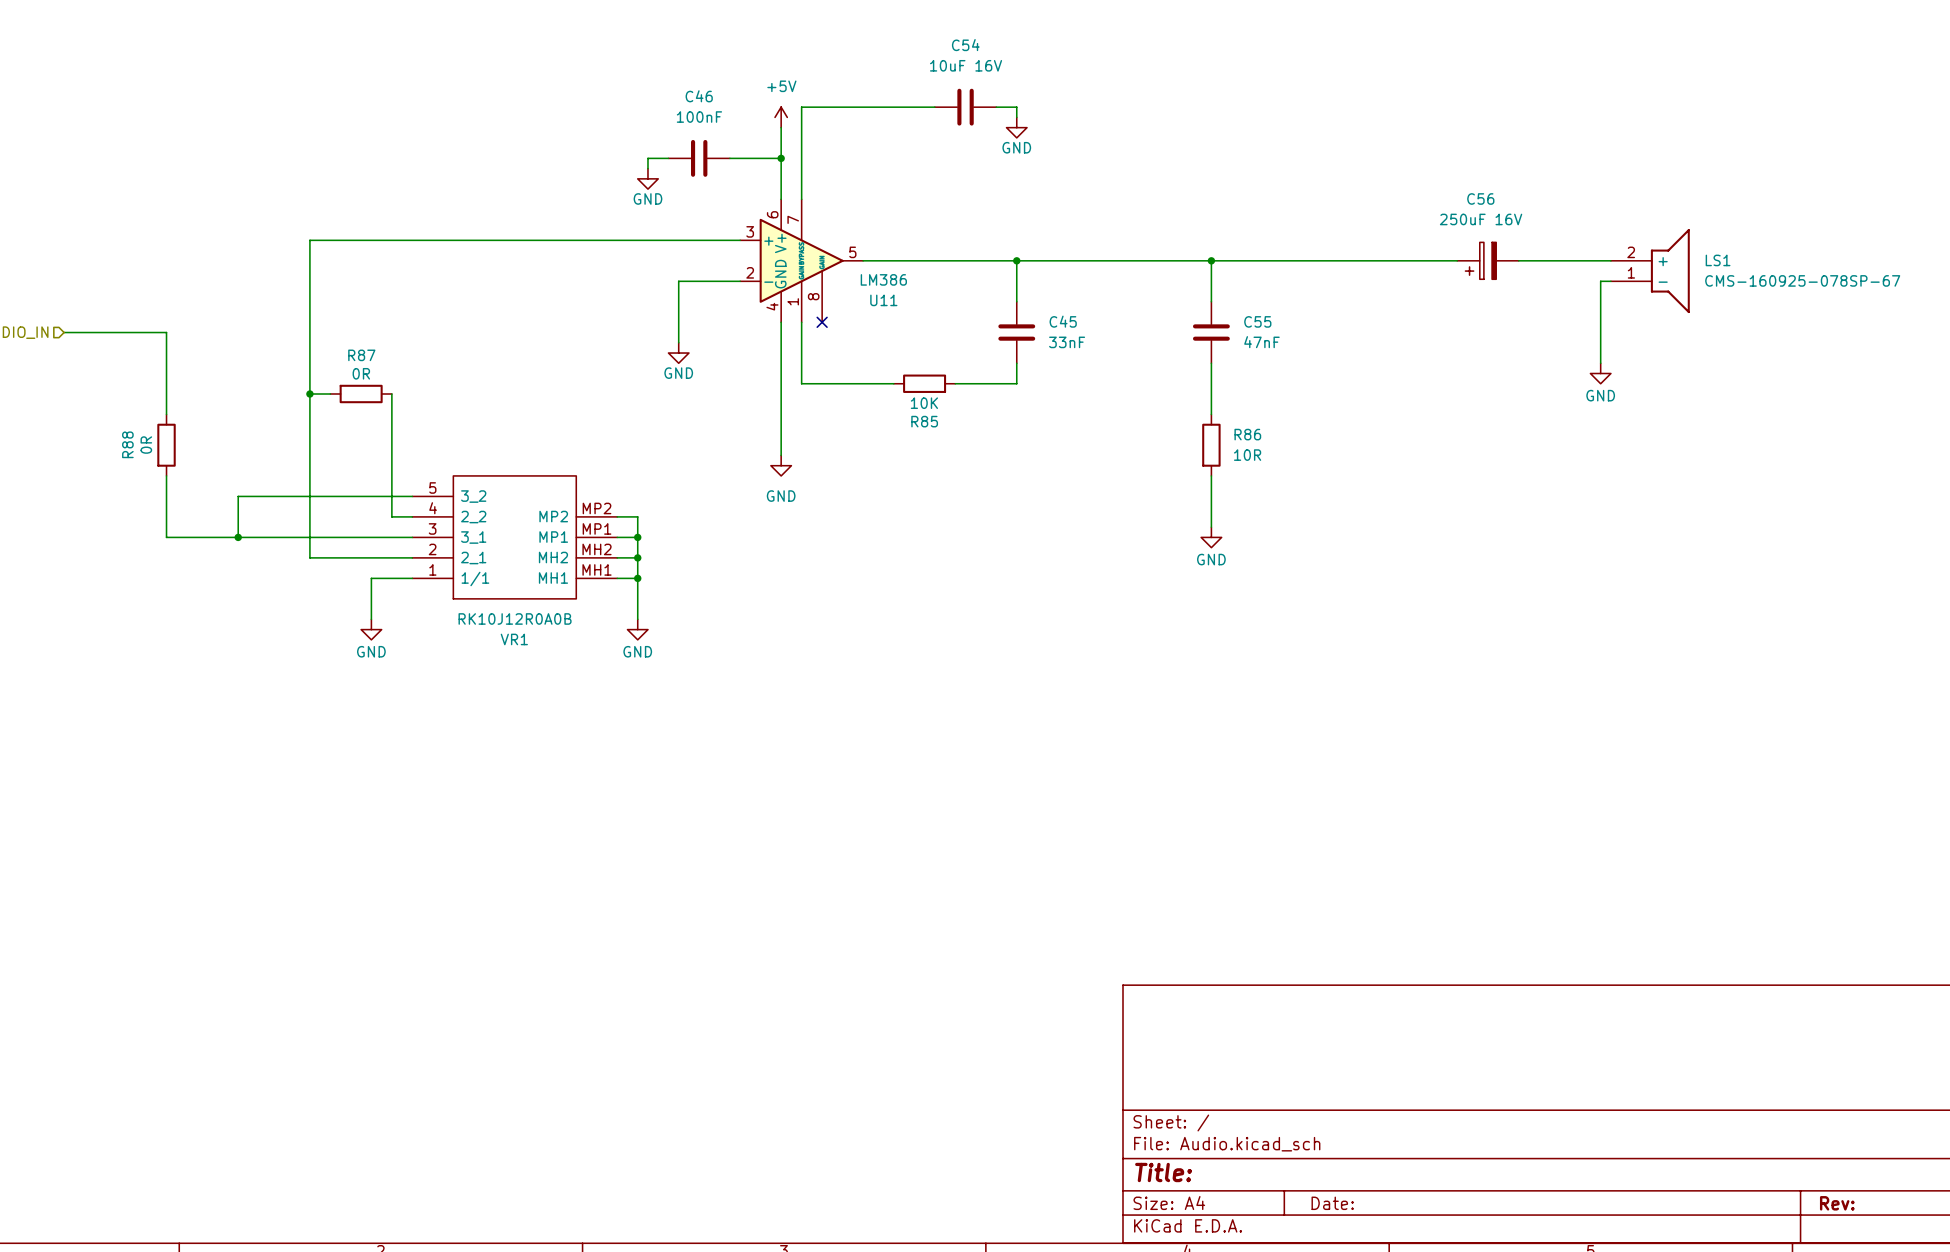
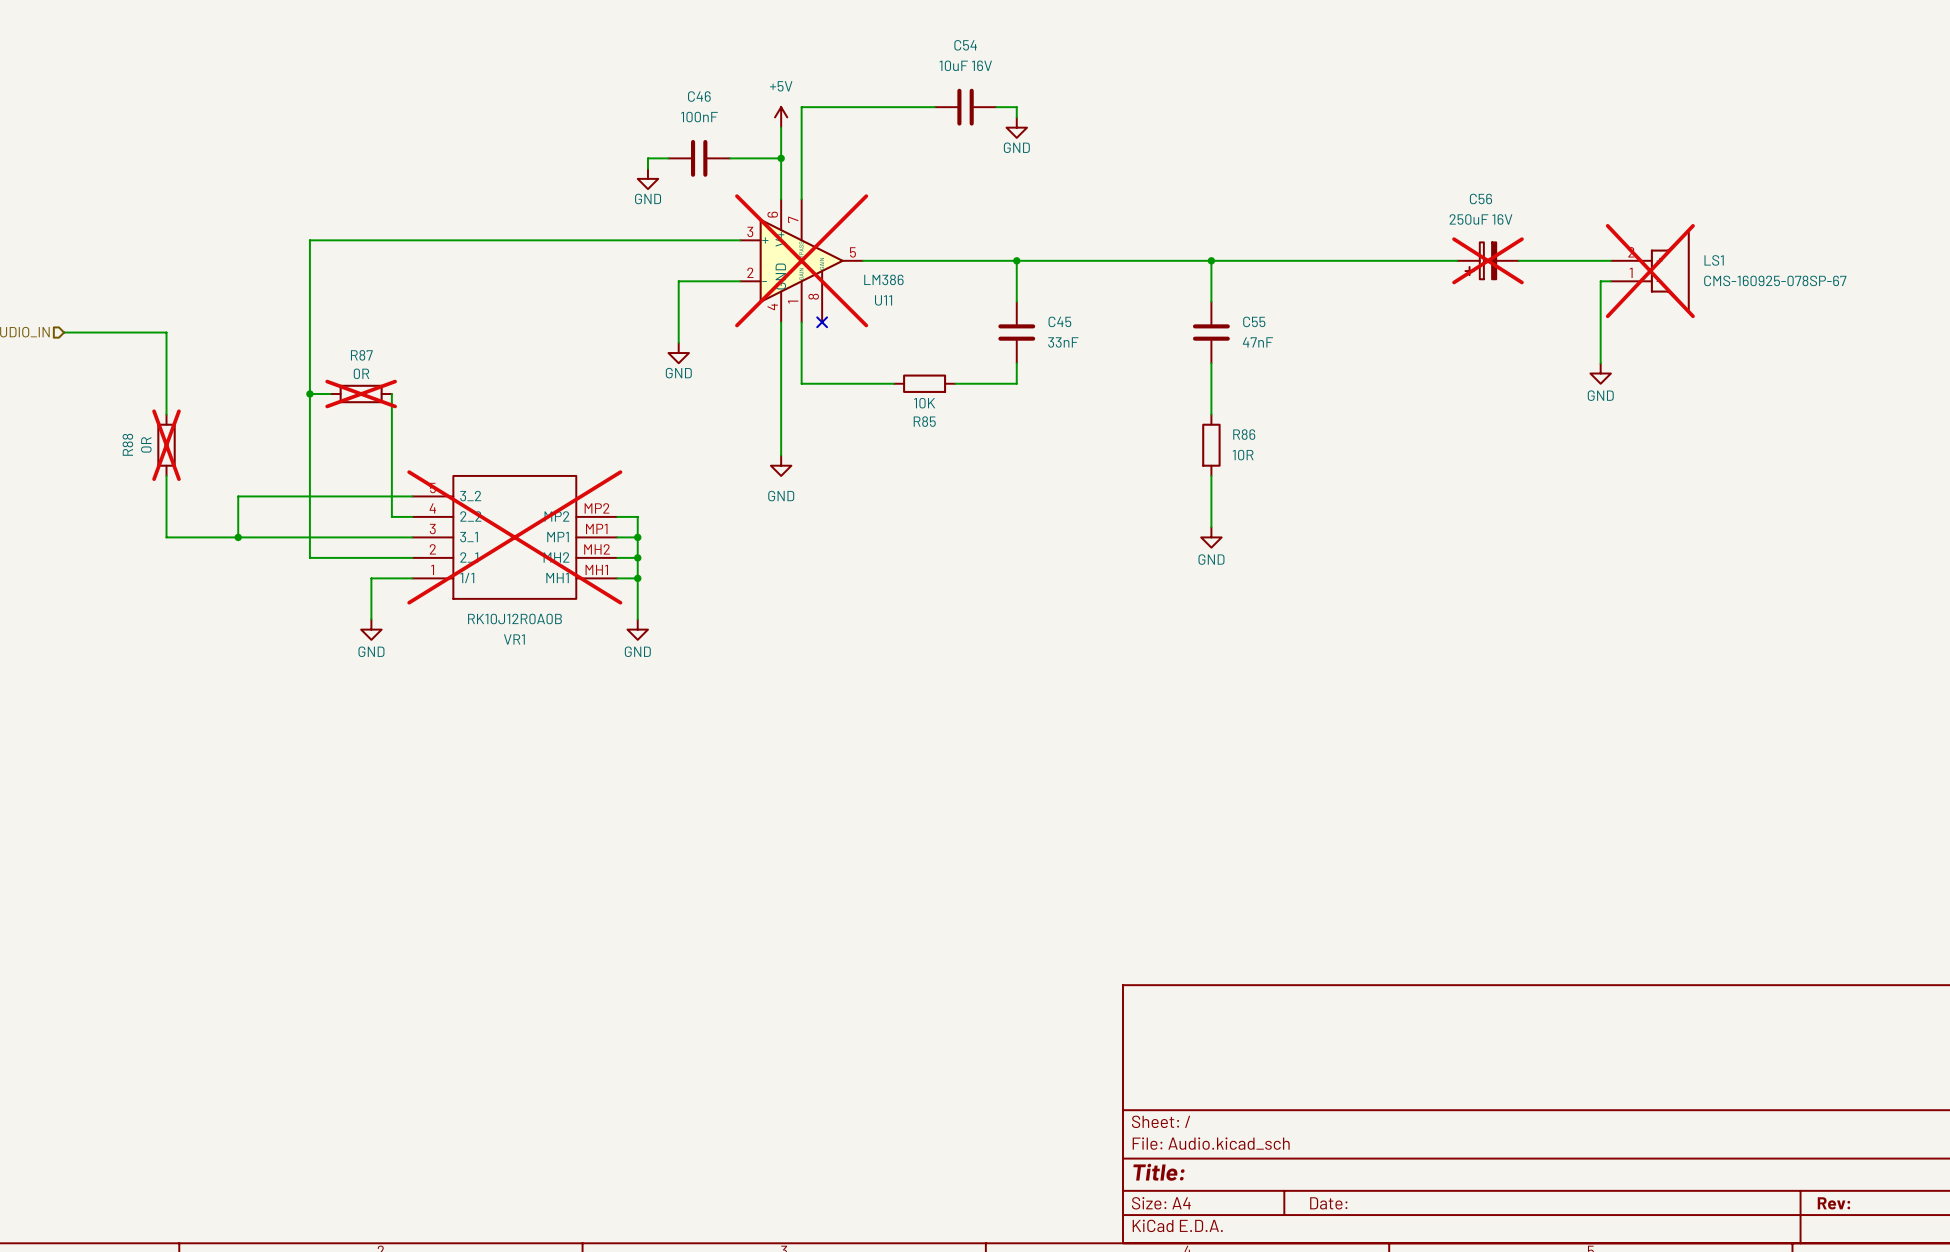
U11 do-not-place cross: none -> (801, 260)
C56 do-not-place cross: none -> (1487, 260)
LS1 do-not-place cross: none -> (1650, 271)
R87 do-not-place cross: none -> (361, 393)
R88 do-not-place cross: none -> (166, 445)
VR1 do-not-place cross: none -> (514, 537)

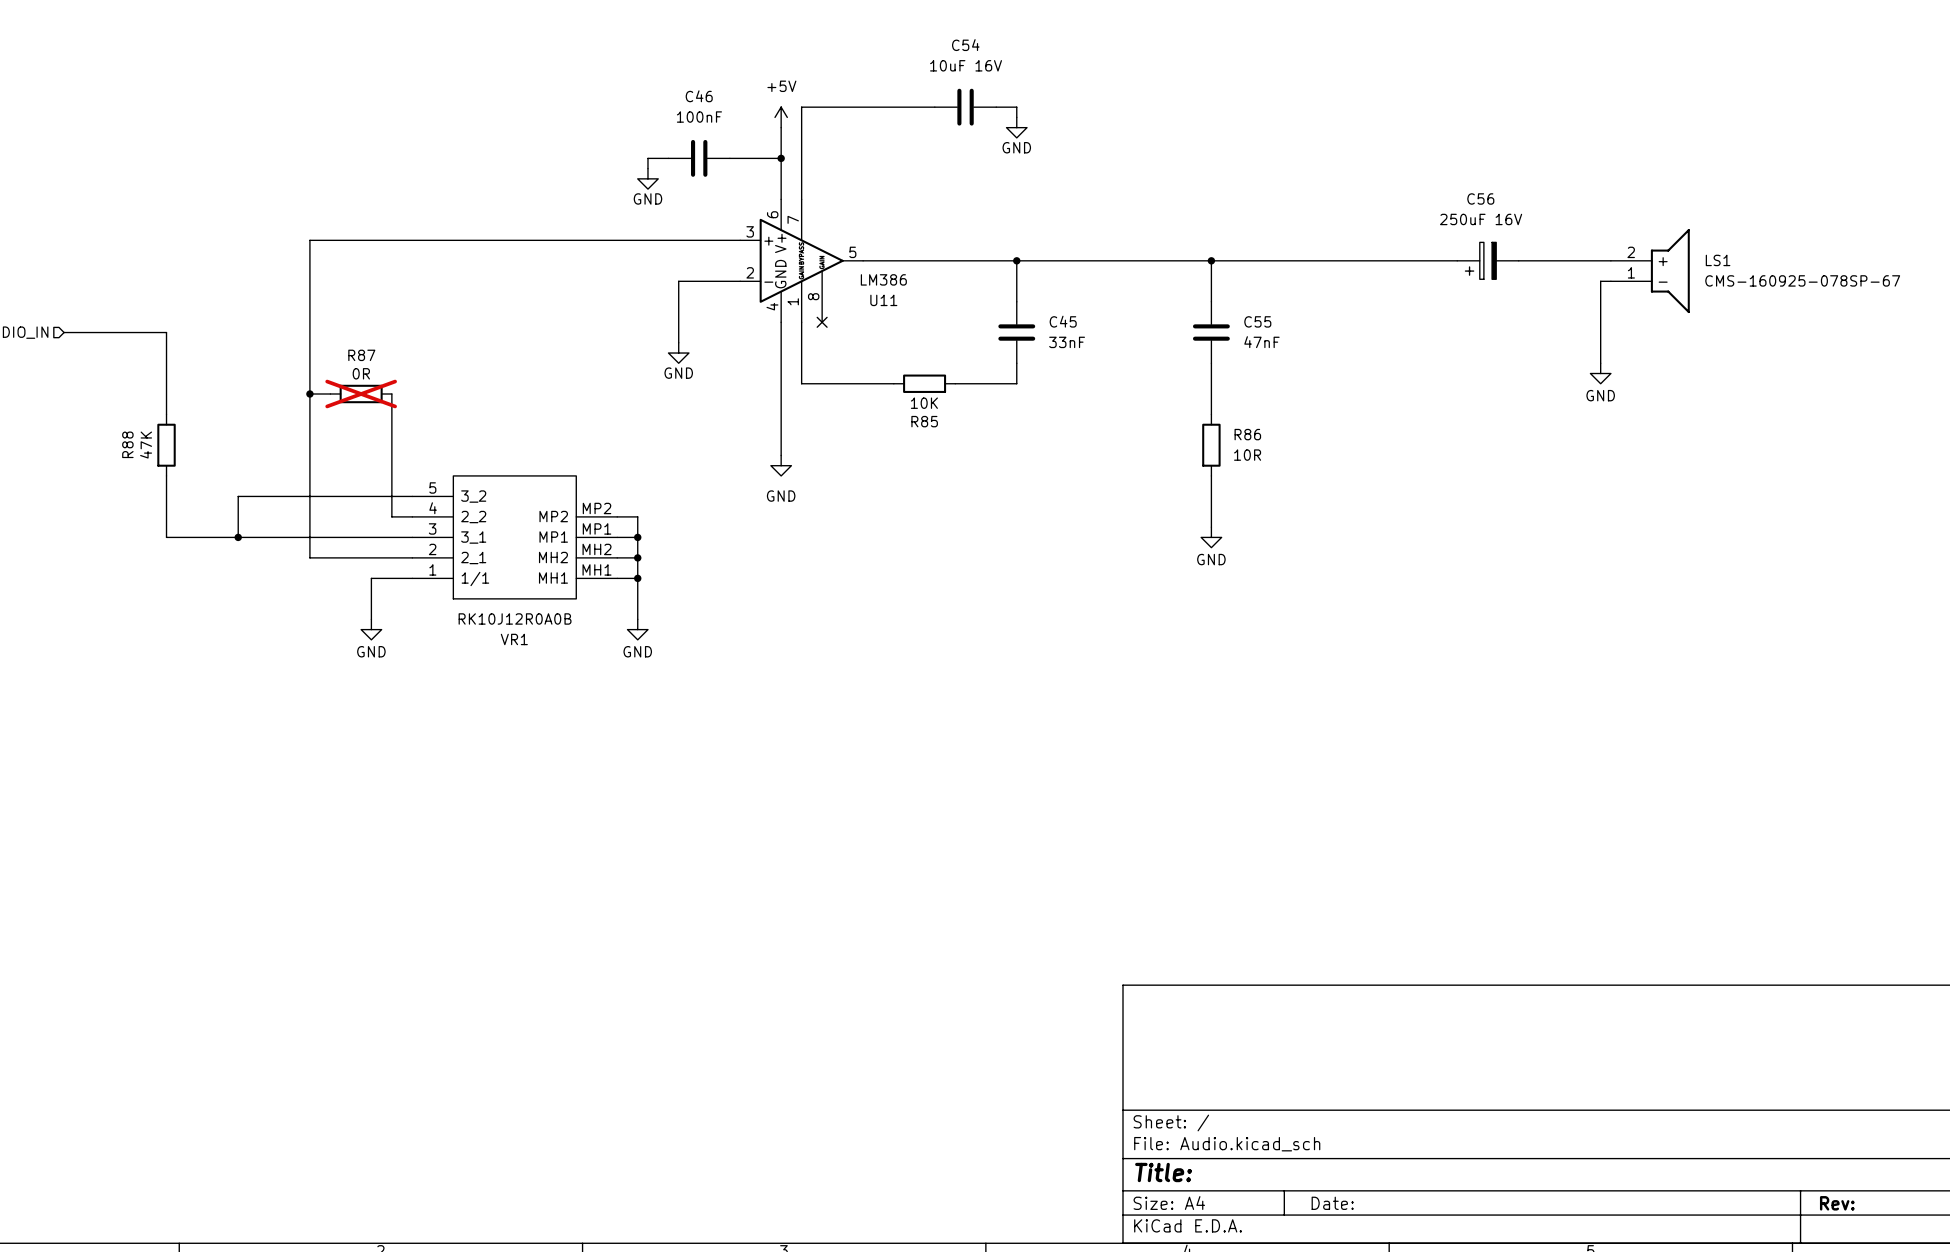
U11 do-not-place cross: (801, 260) -> none
C56 do-not-place cross: (1487, 260) -> none
LS1 do-not-place cross: (1650, 271) -> none
R88 value: 0R (146, 444) -> 47K (146, 445)
R88 do-not-place cross: (166, 445) -> none
VR1 do-not-place cross: (514, 537) -> none

